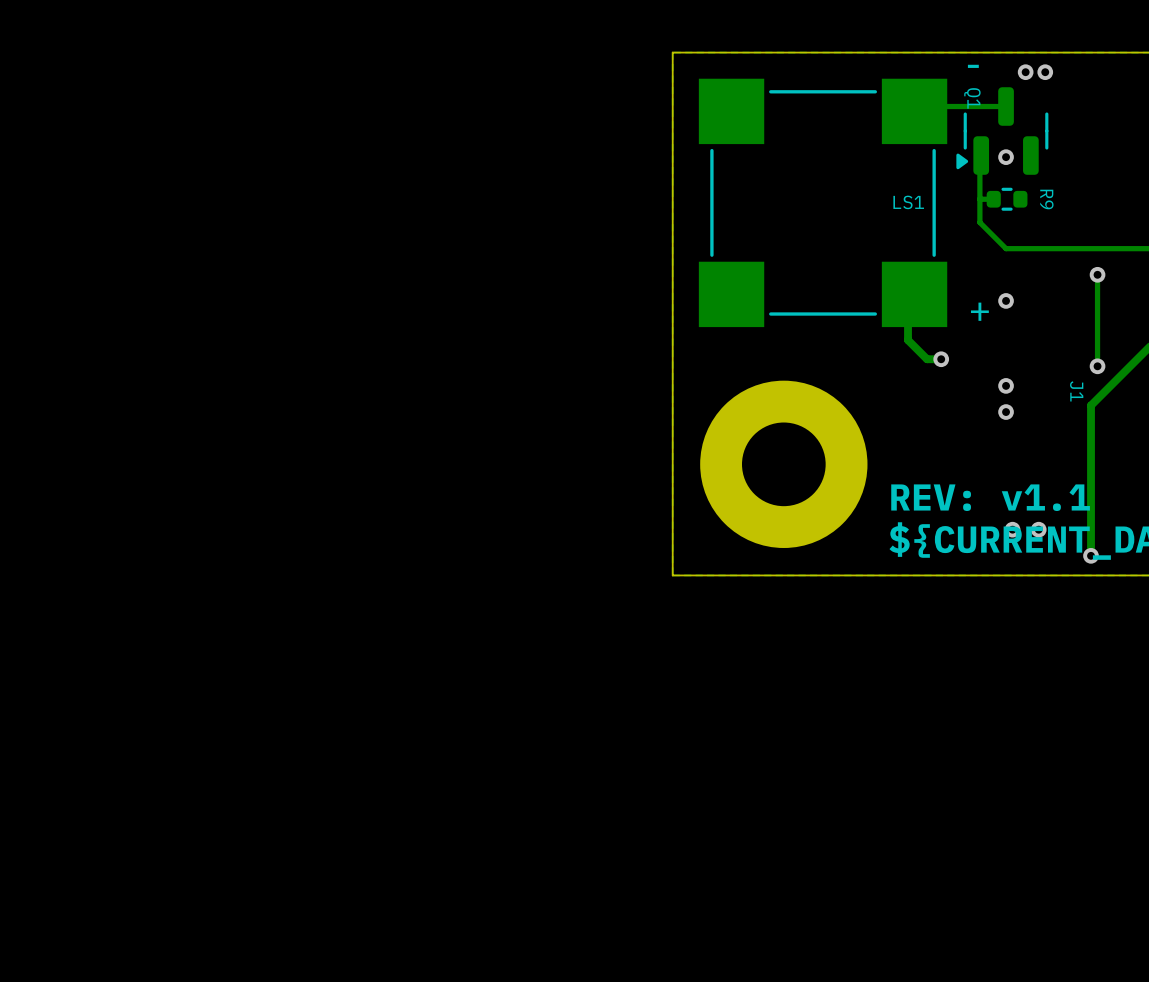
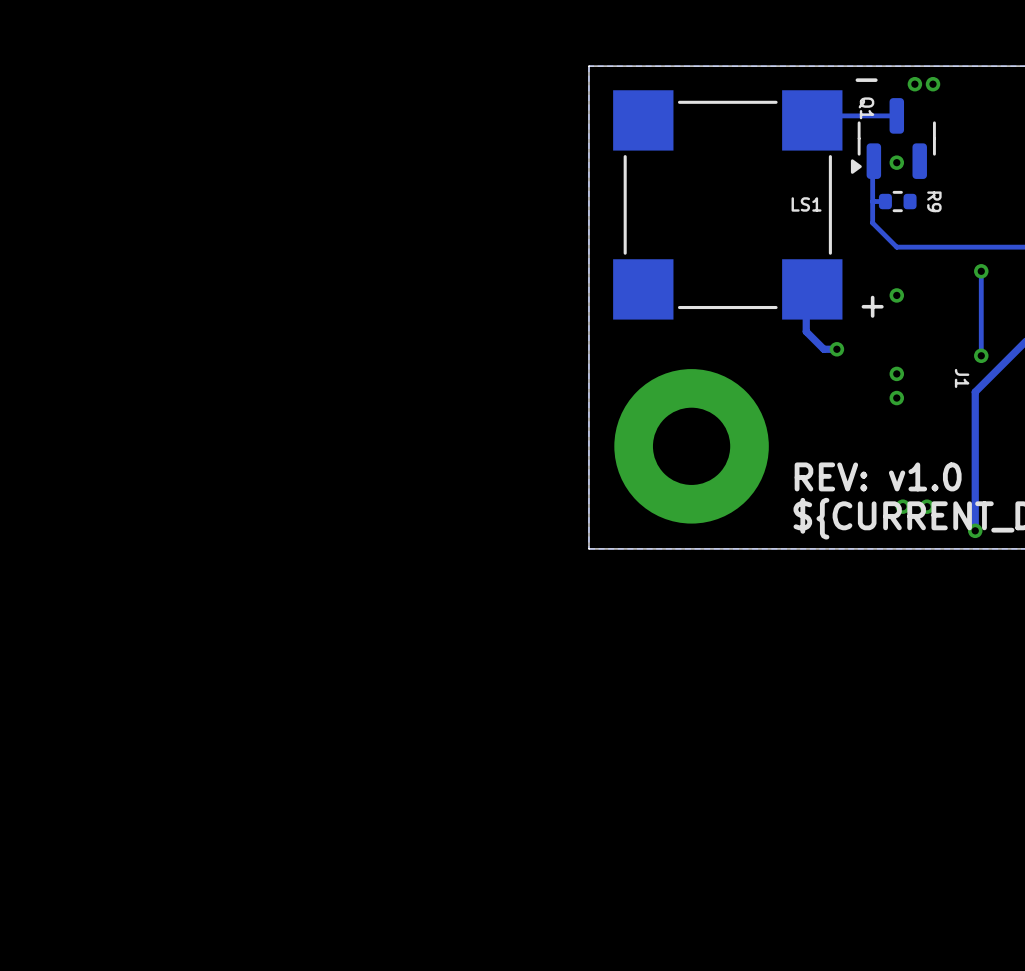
text: REV: v1.1 (990, 497) -> REV: v1.0 (878, 476)

